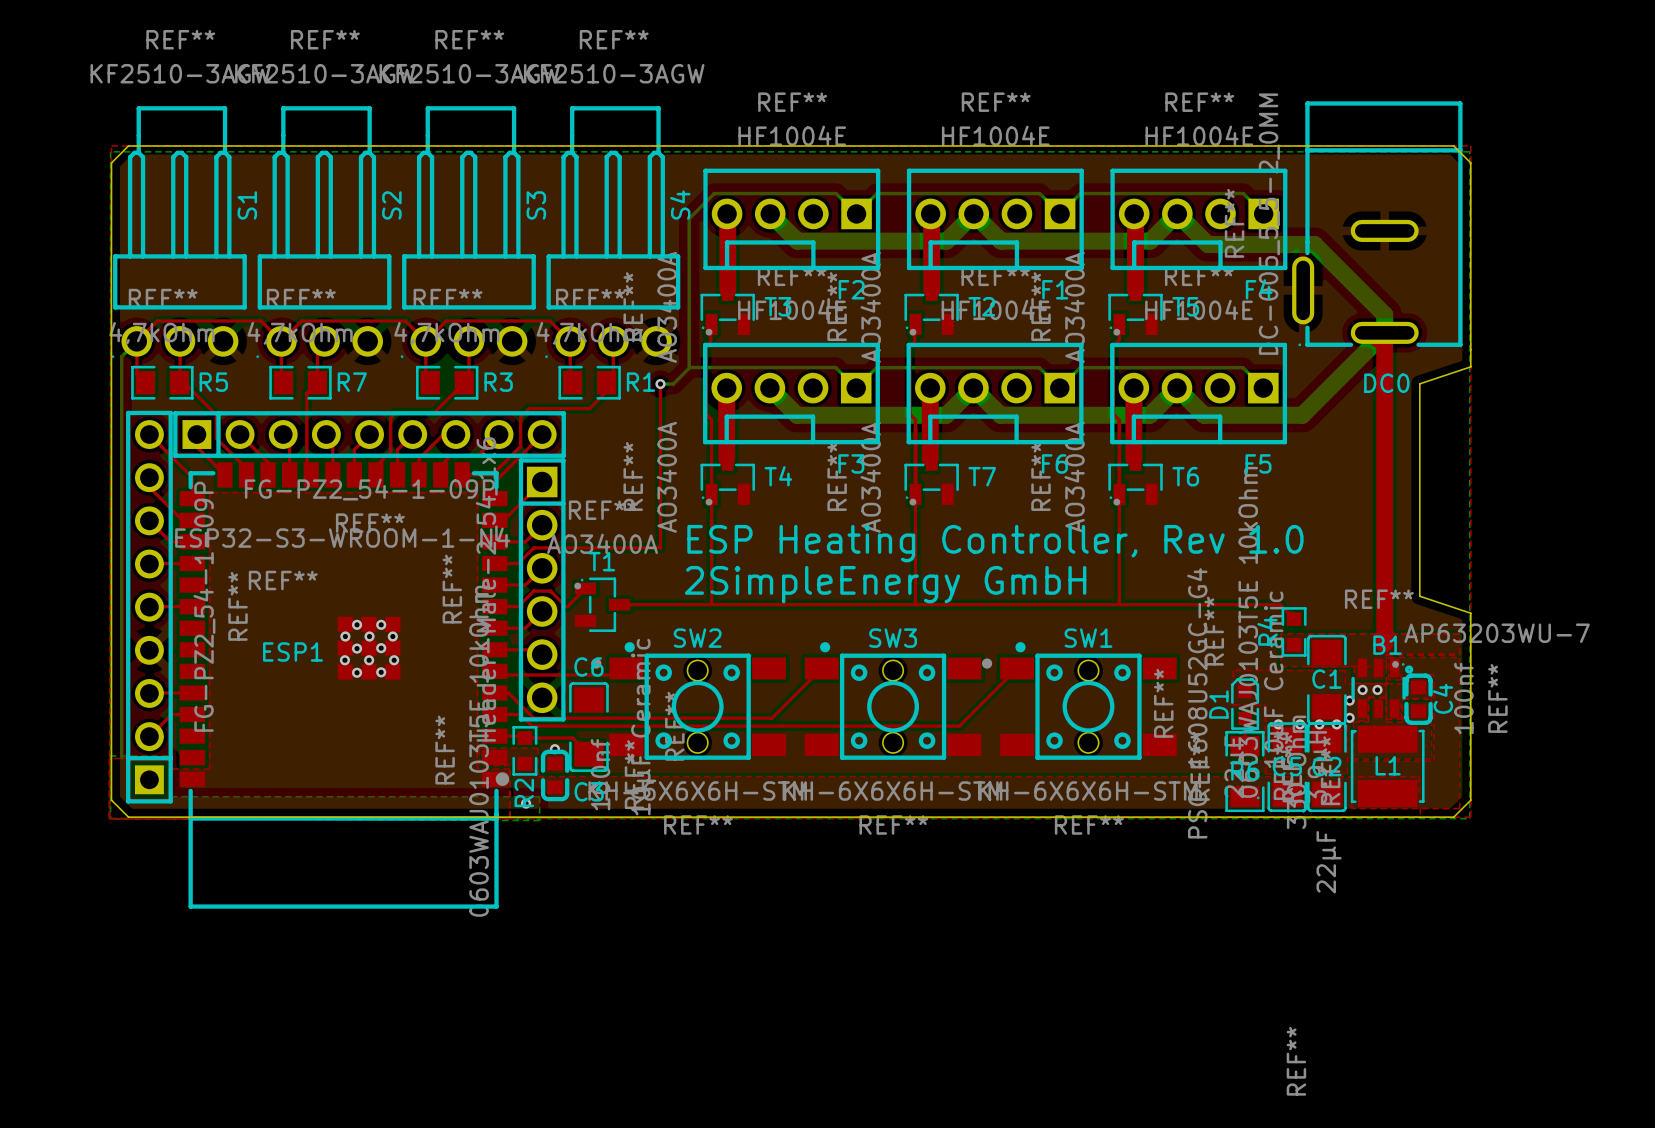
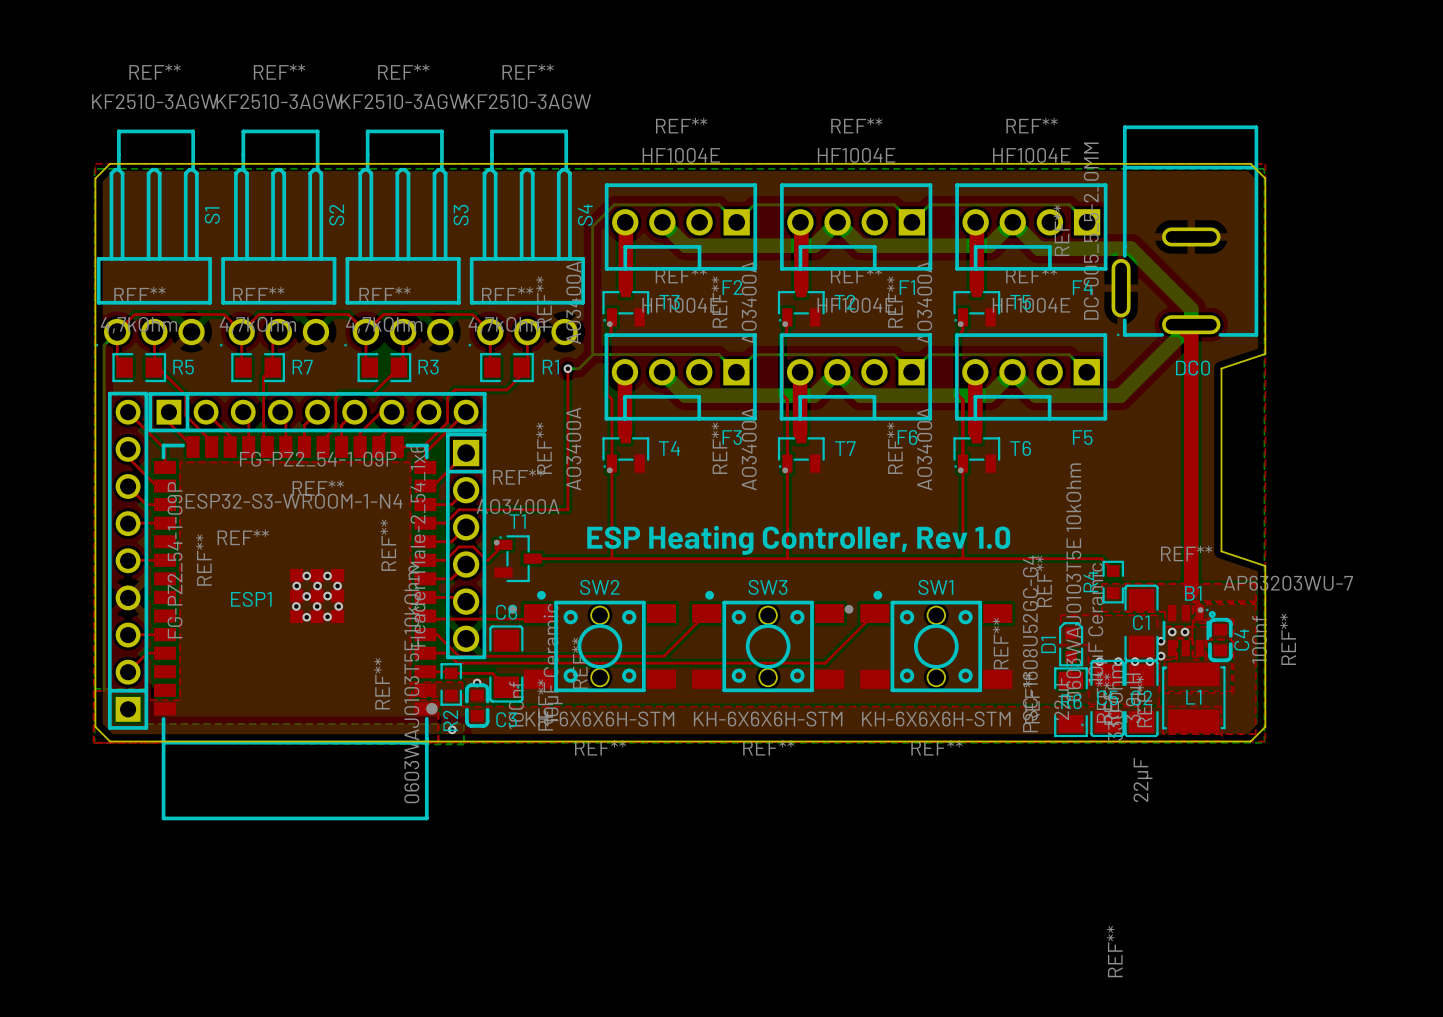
text: ESP Heating Controller, Rev 1.0 (995, 543) -> none
text: 2SimpleEnergy GmbH (885, 584) -> ESP Heating Controller, Rev 1.0 (798, 540)

